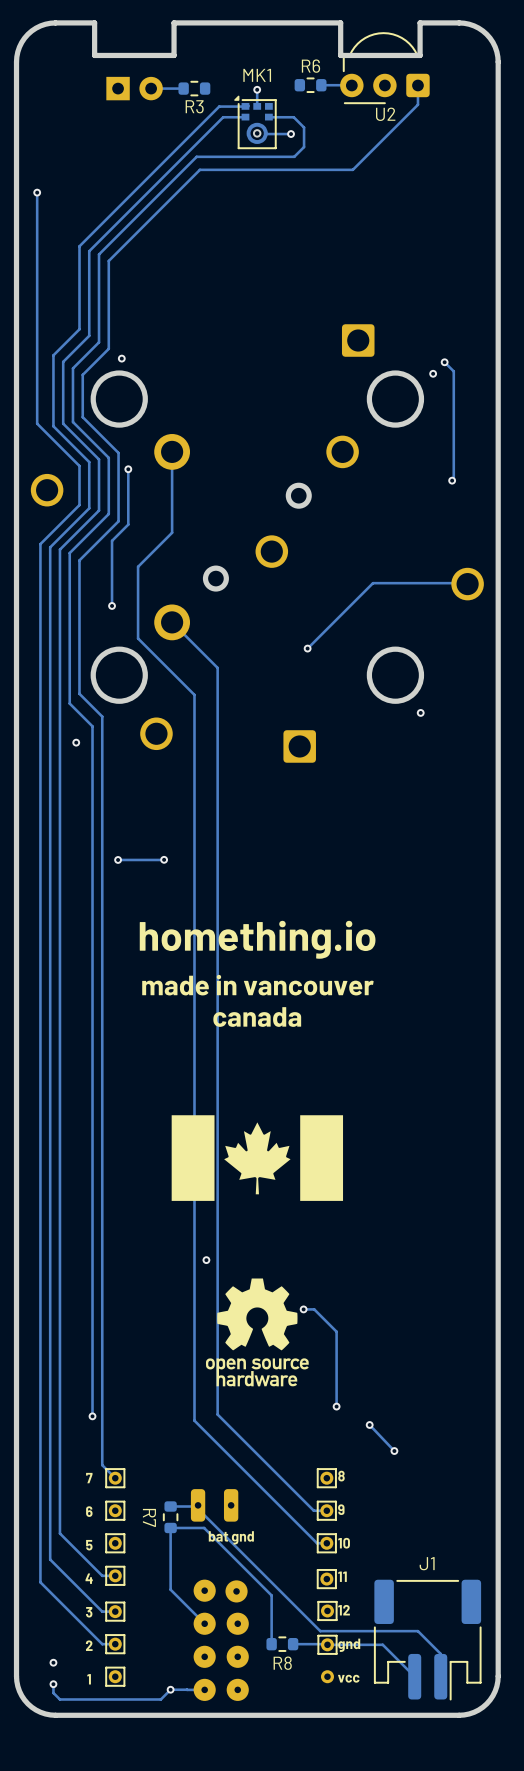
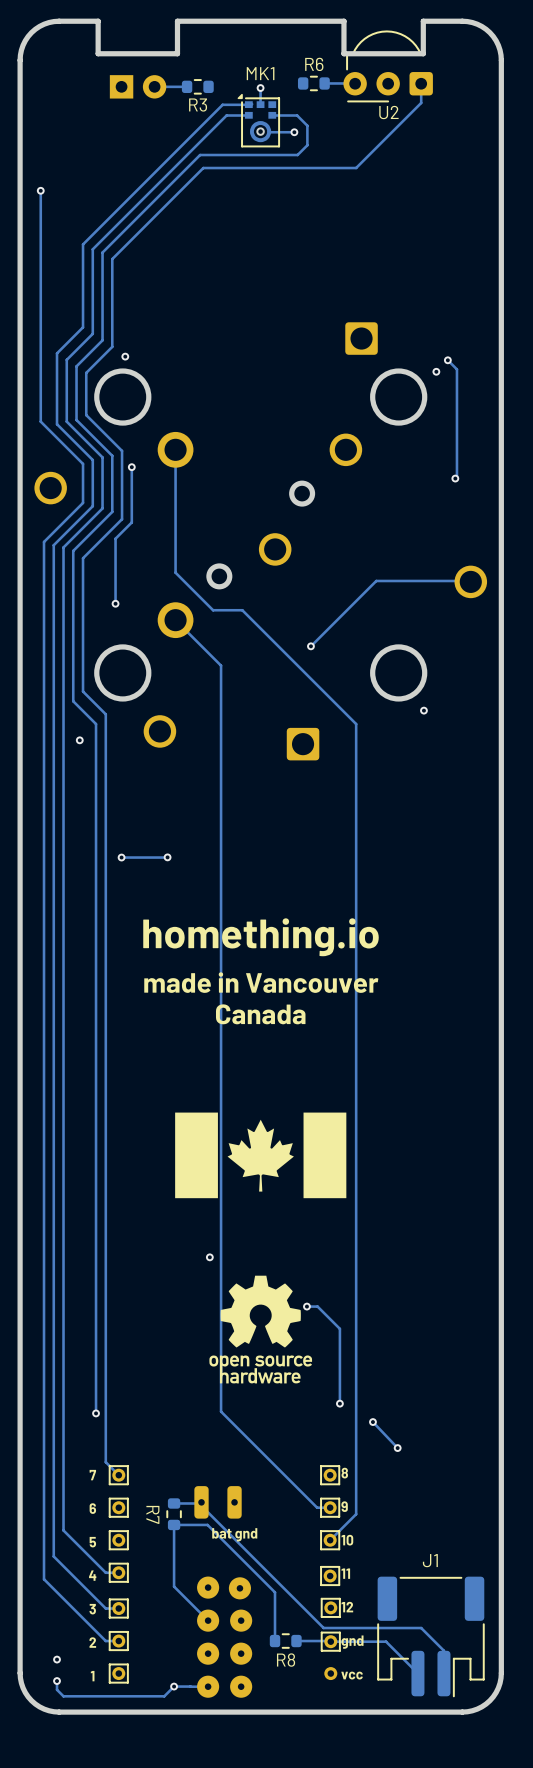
track: (172, 532) (138, 566) (138, 638) (194, 694) (194, 1420) (317, 1543) (326, 1543) -> (175, 530) (175, 572) (213, 610) (242, 610) (356, 724) (356, 1514) (330, 1540)
text: made in vancouver (257, 985) -> made in Vancouver (261, 982)
text: canada (257, 1017) -> Canada (260, 1014)

